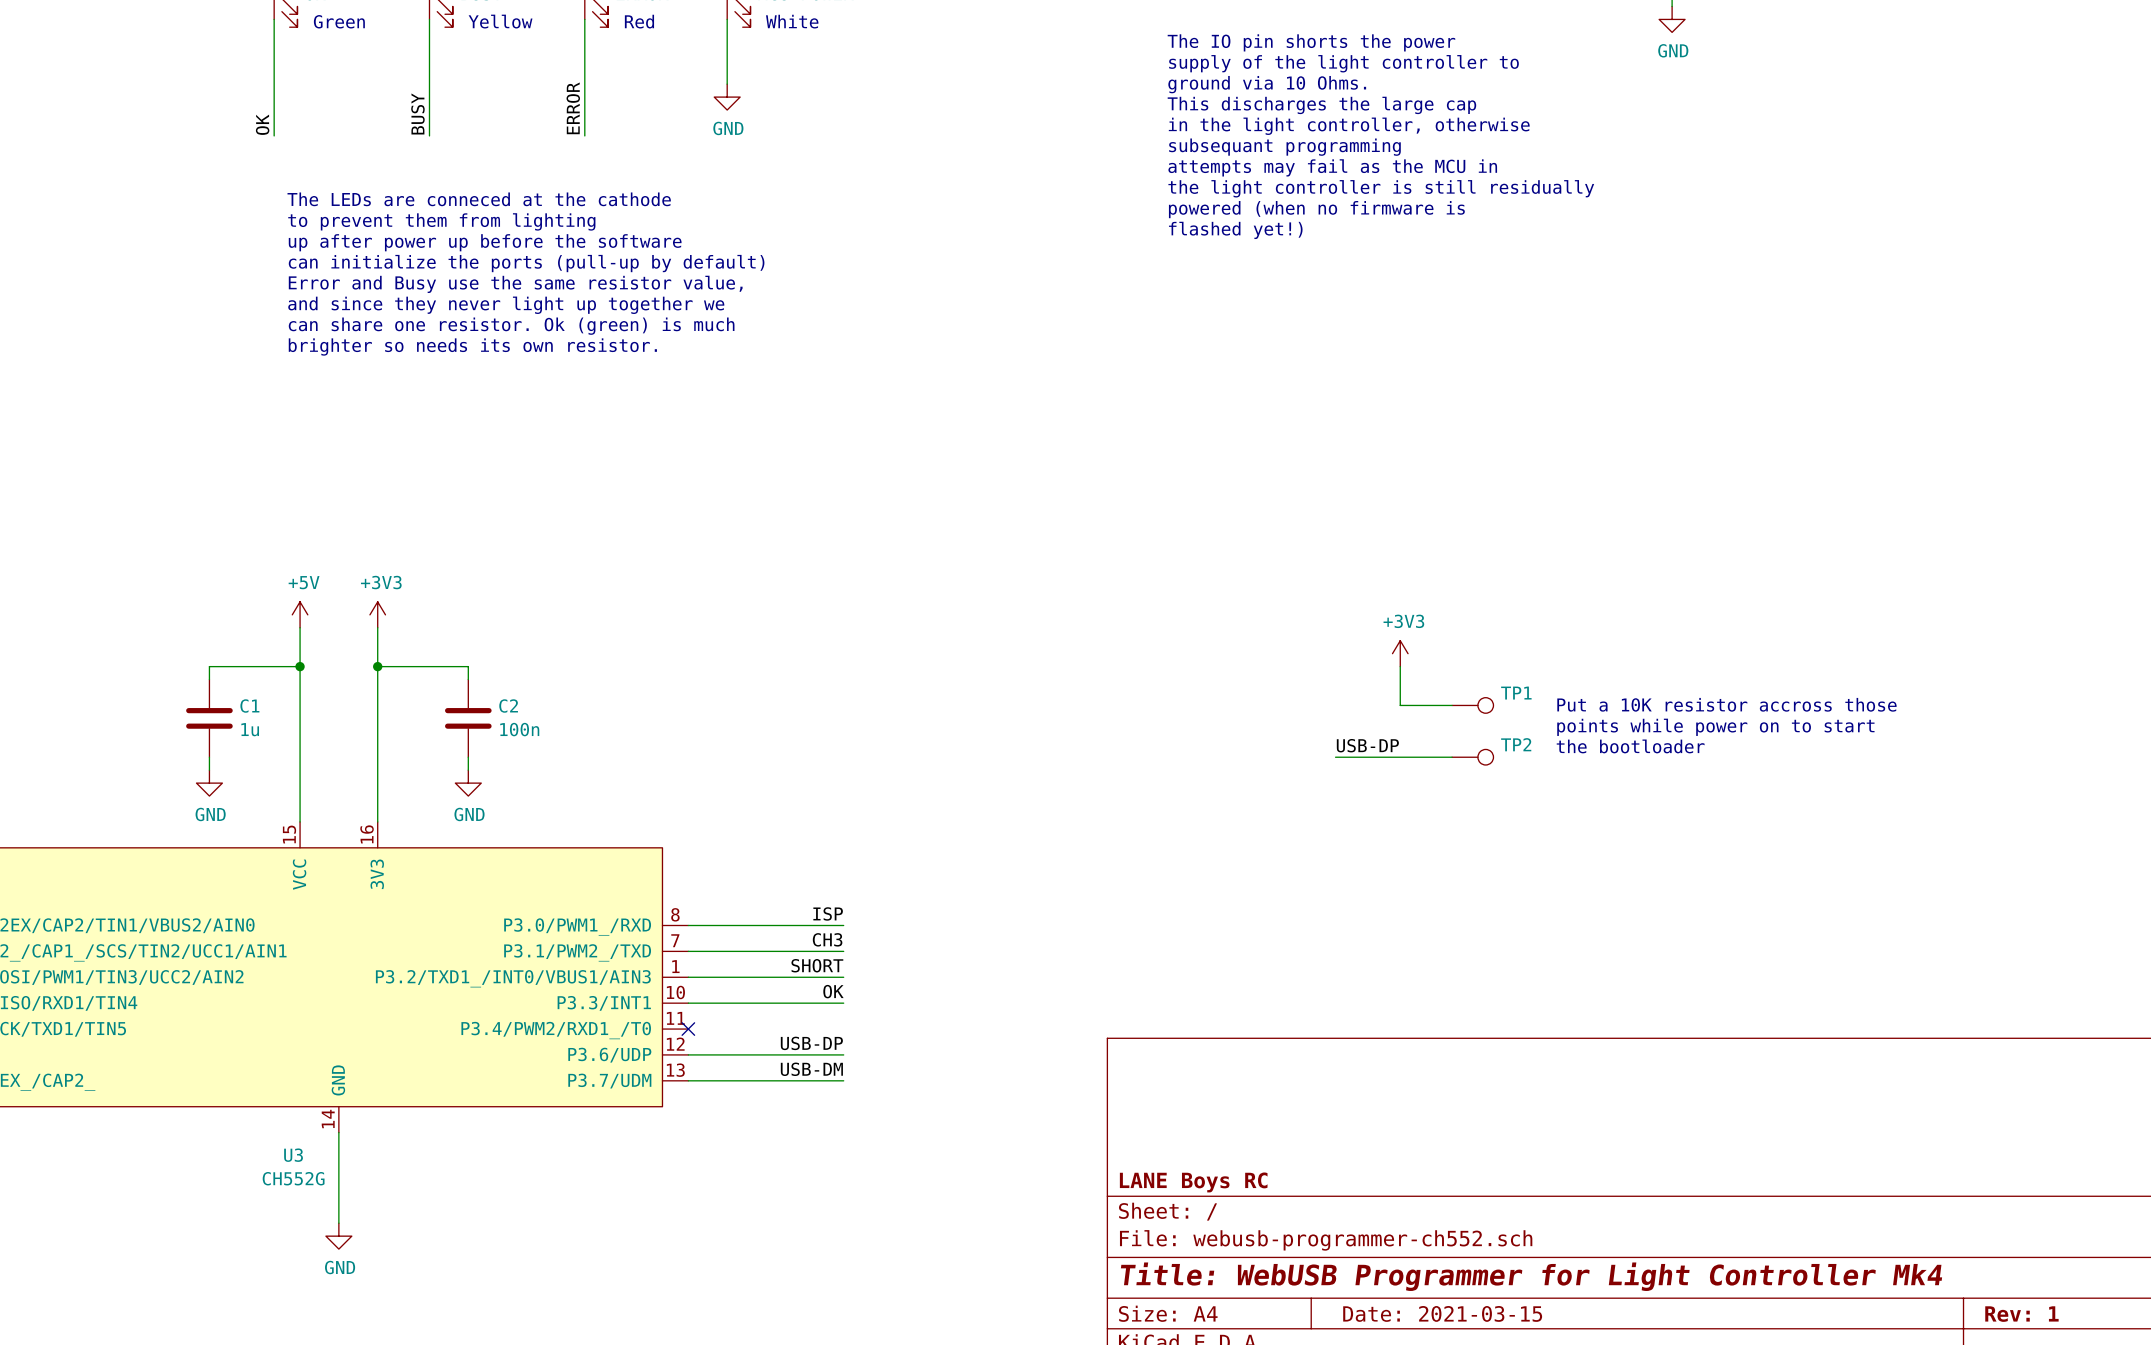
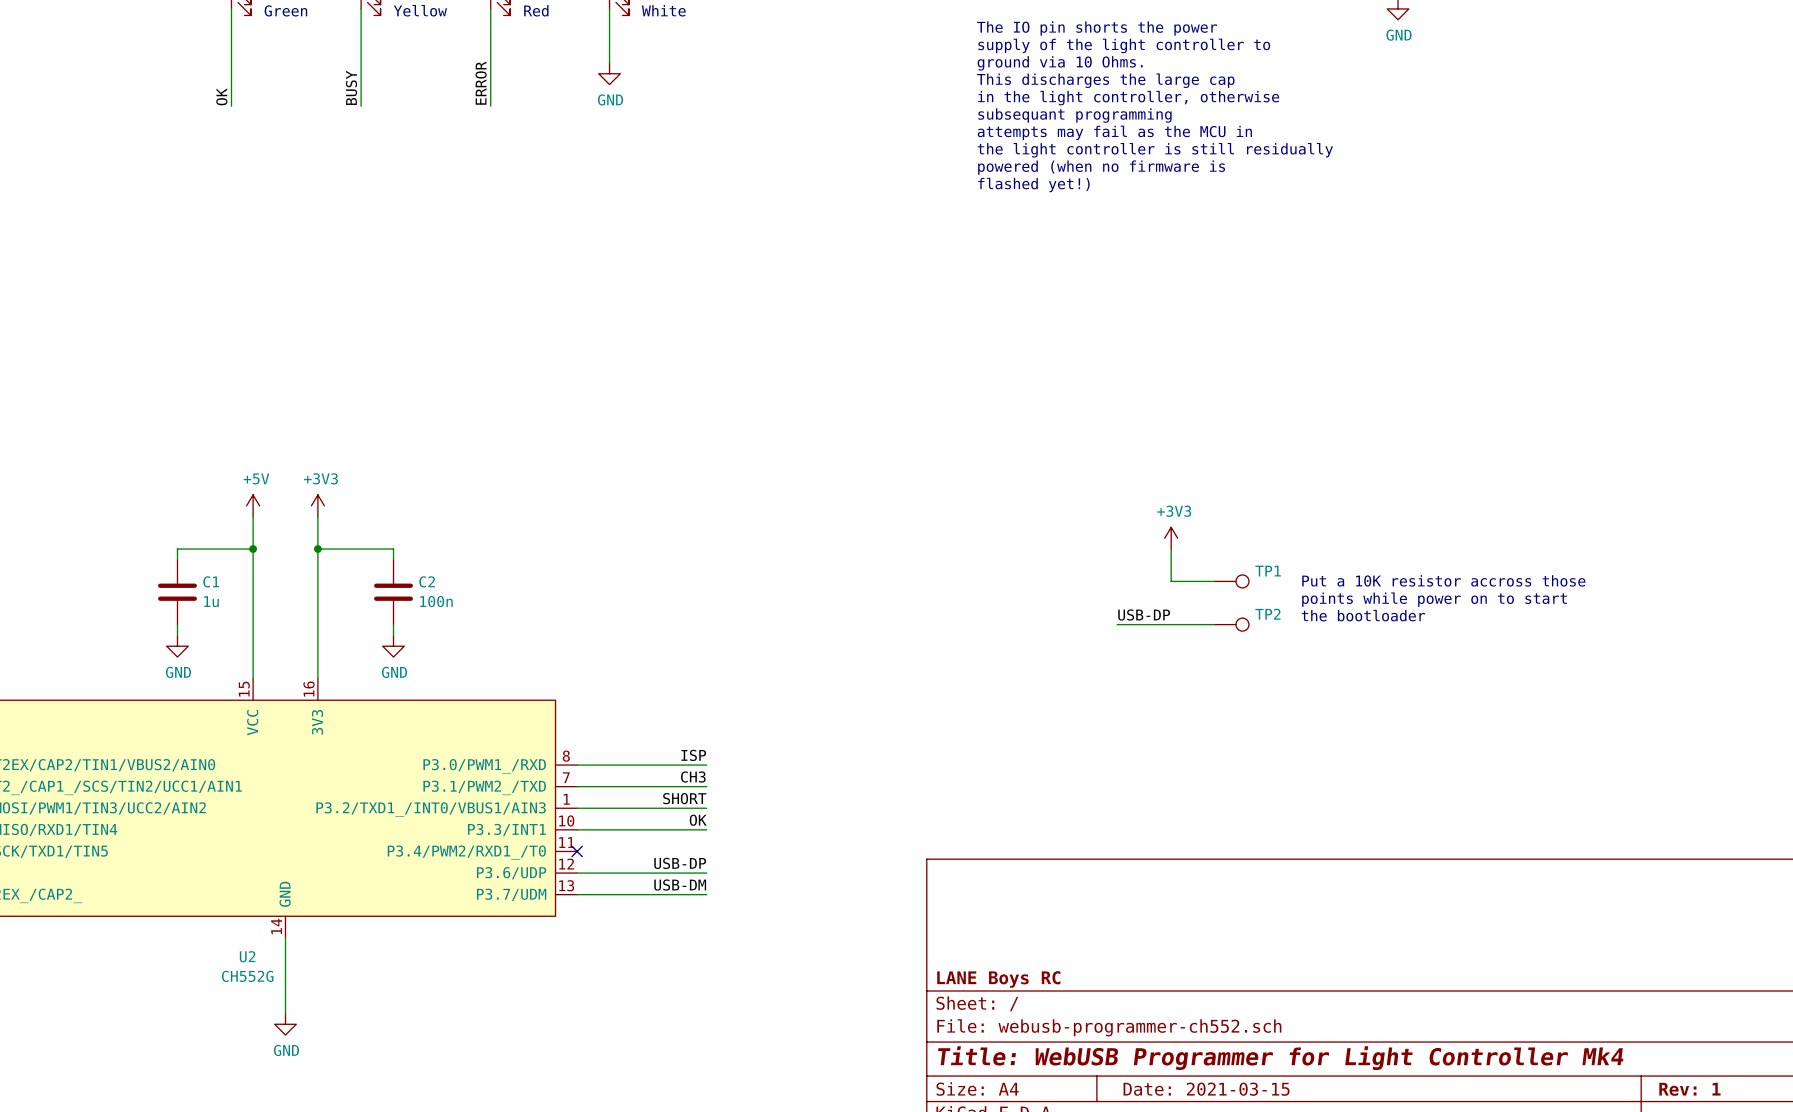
text: The LEDs are conneced at the cathode (479, 199) -> none
text: to prevent them from lighting (441, 221) -> none
text: up after power up before the software (485, 242) -> none
text: can initialize the ports (pull-up by default) (526, 263) -> none
text: Error and Busy use the same resistor value, (515, 284) -> none
text: and since they never light up together we (506, 305) -> none
text: can share one resistor. Ok (green) is much (511, 326) -> none
text: brighter so needs its own resistor. (472, 347) -> none
U3 name: U3 (293, 1155) -> U2 (247, 956)

